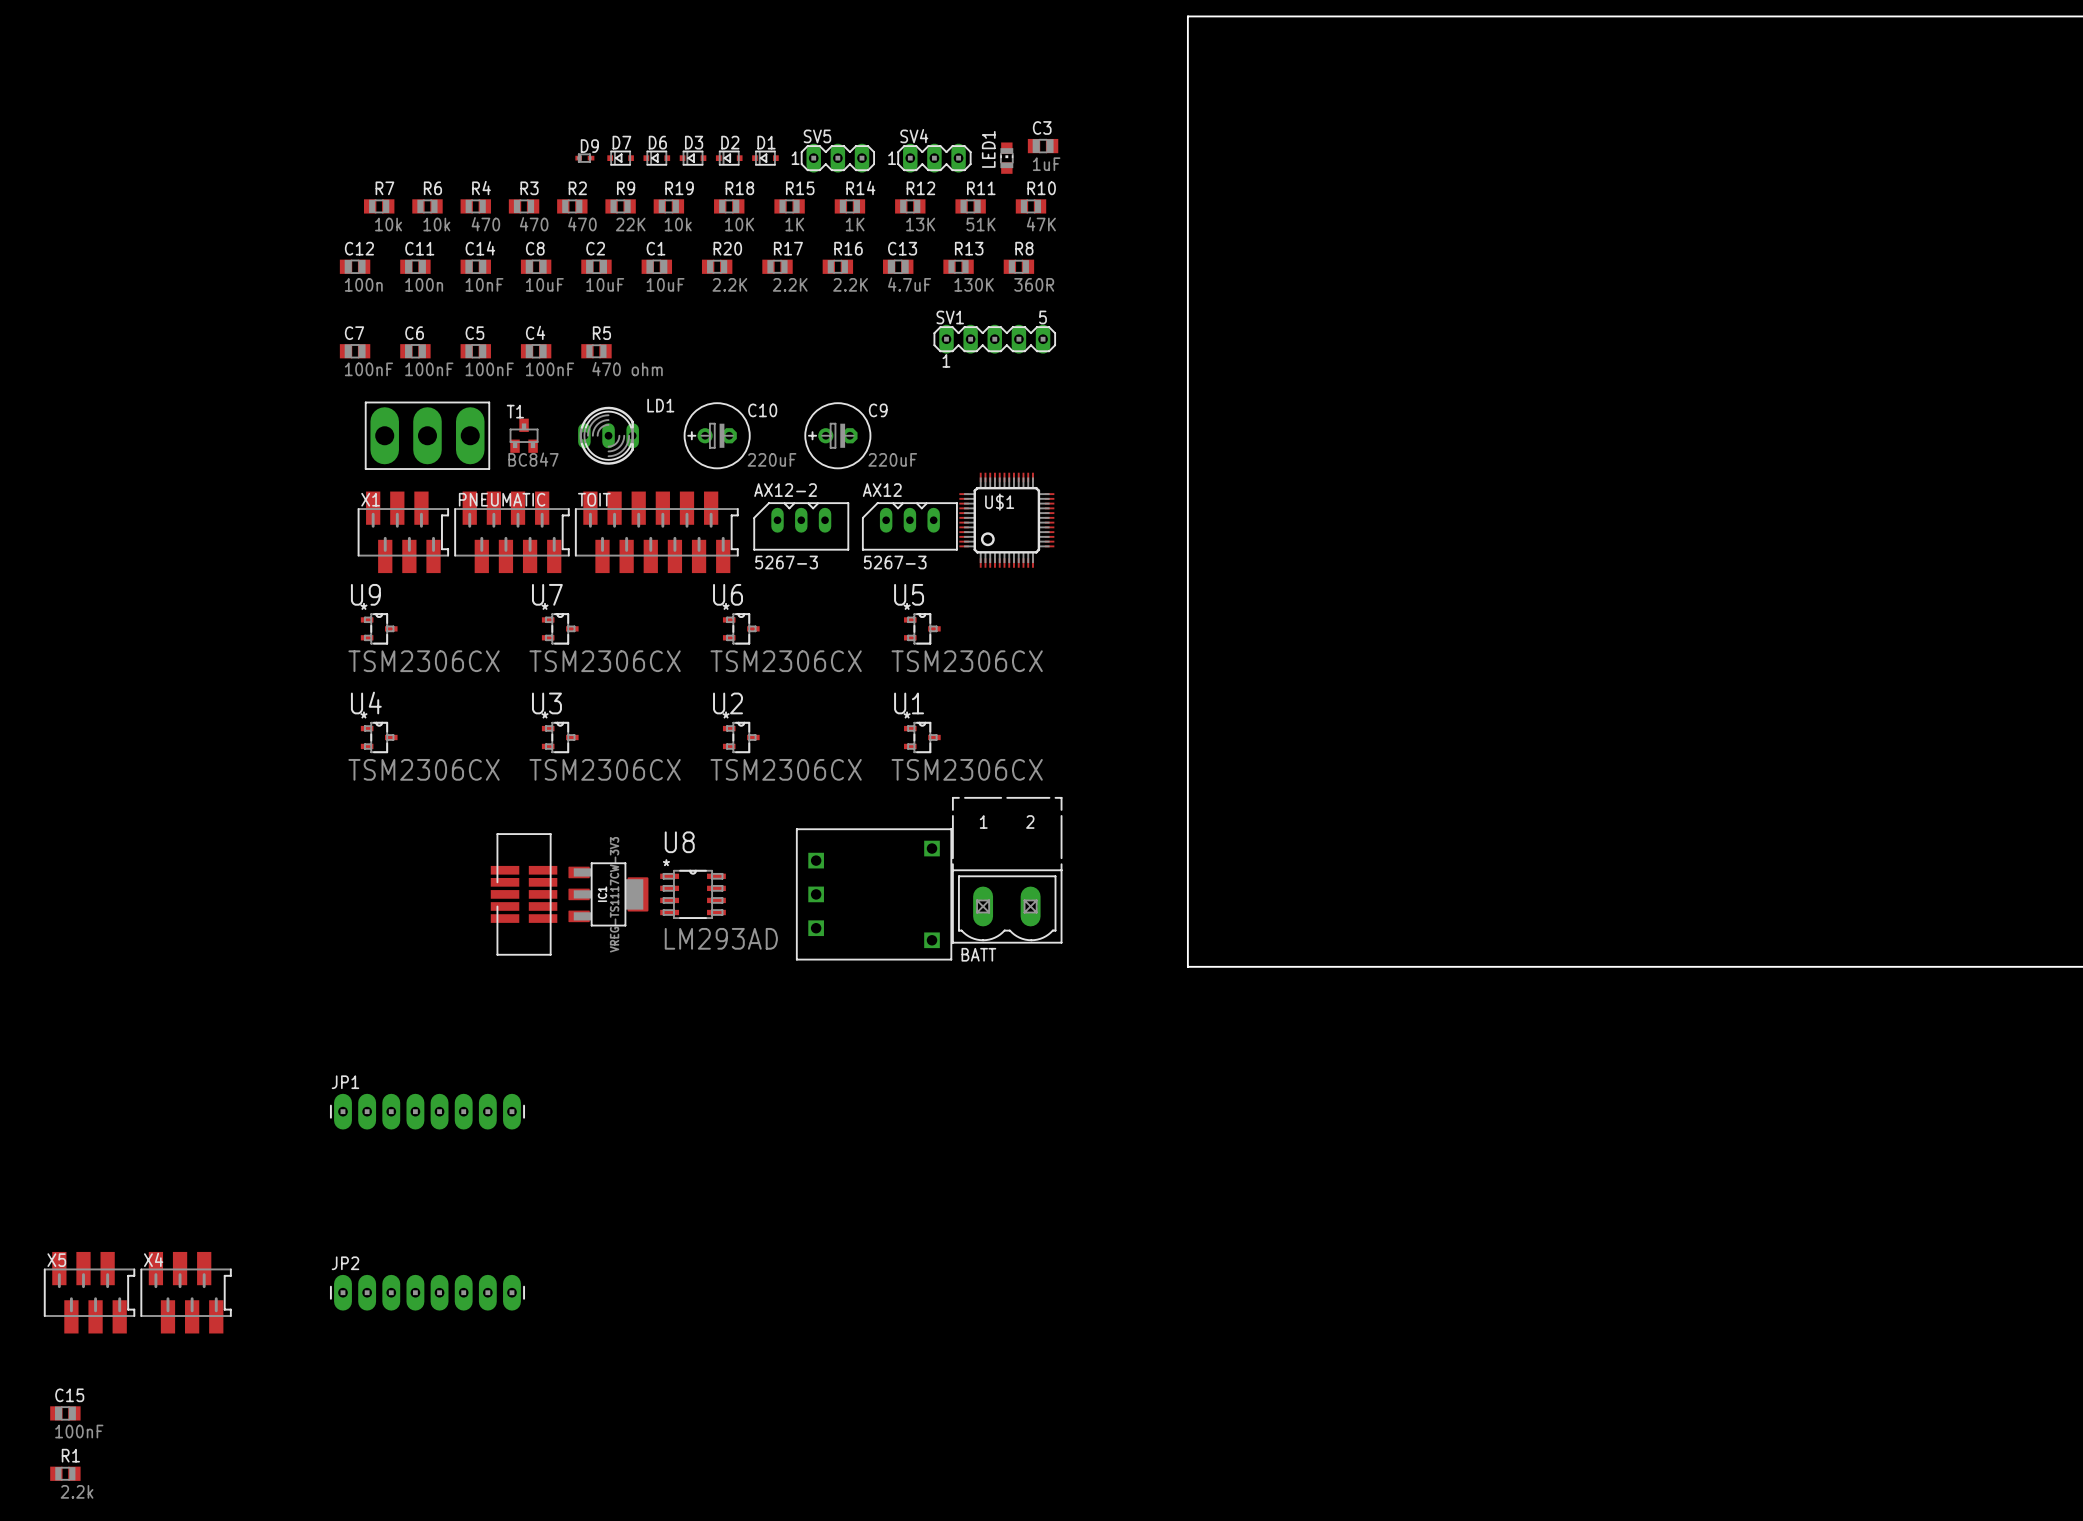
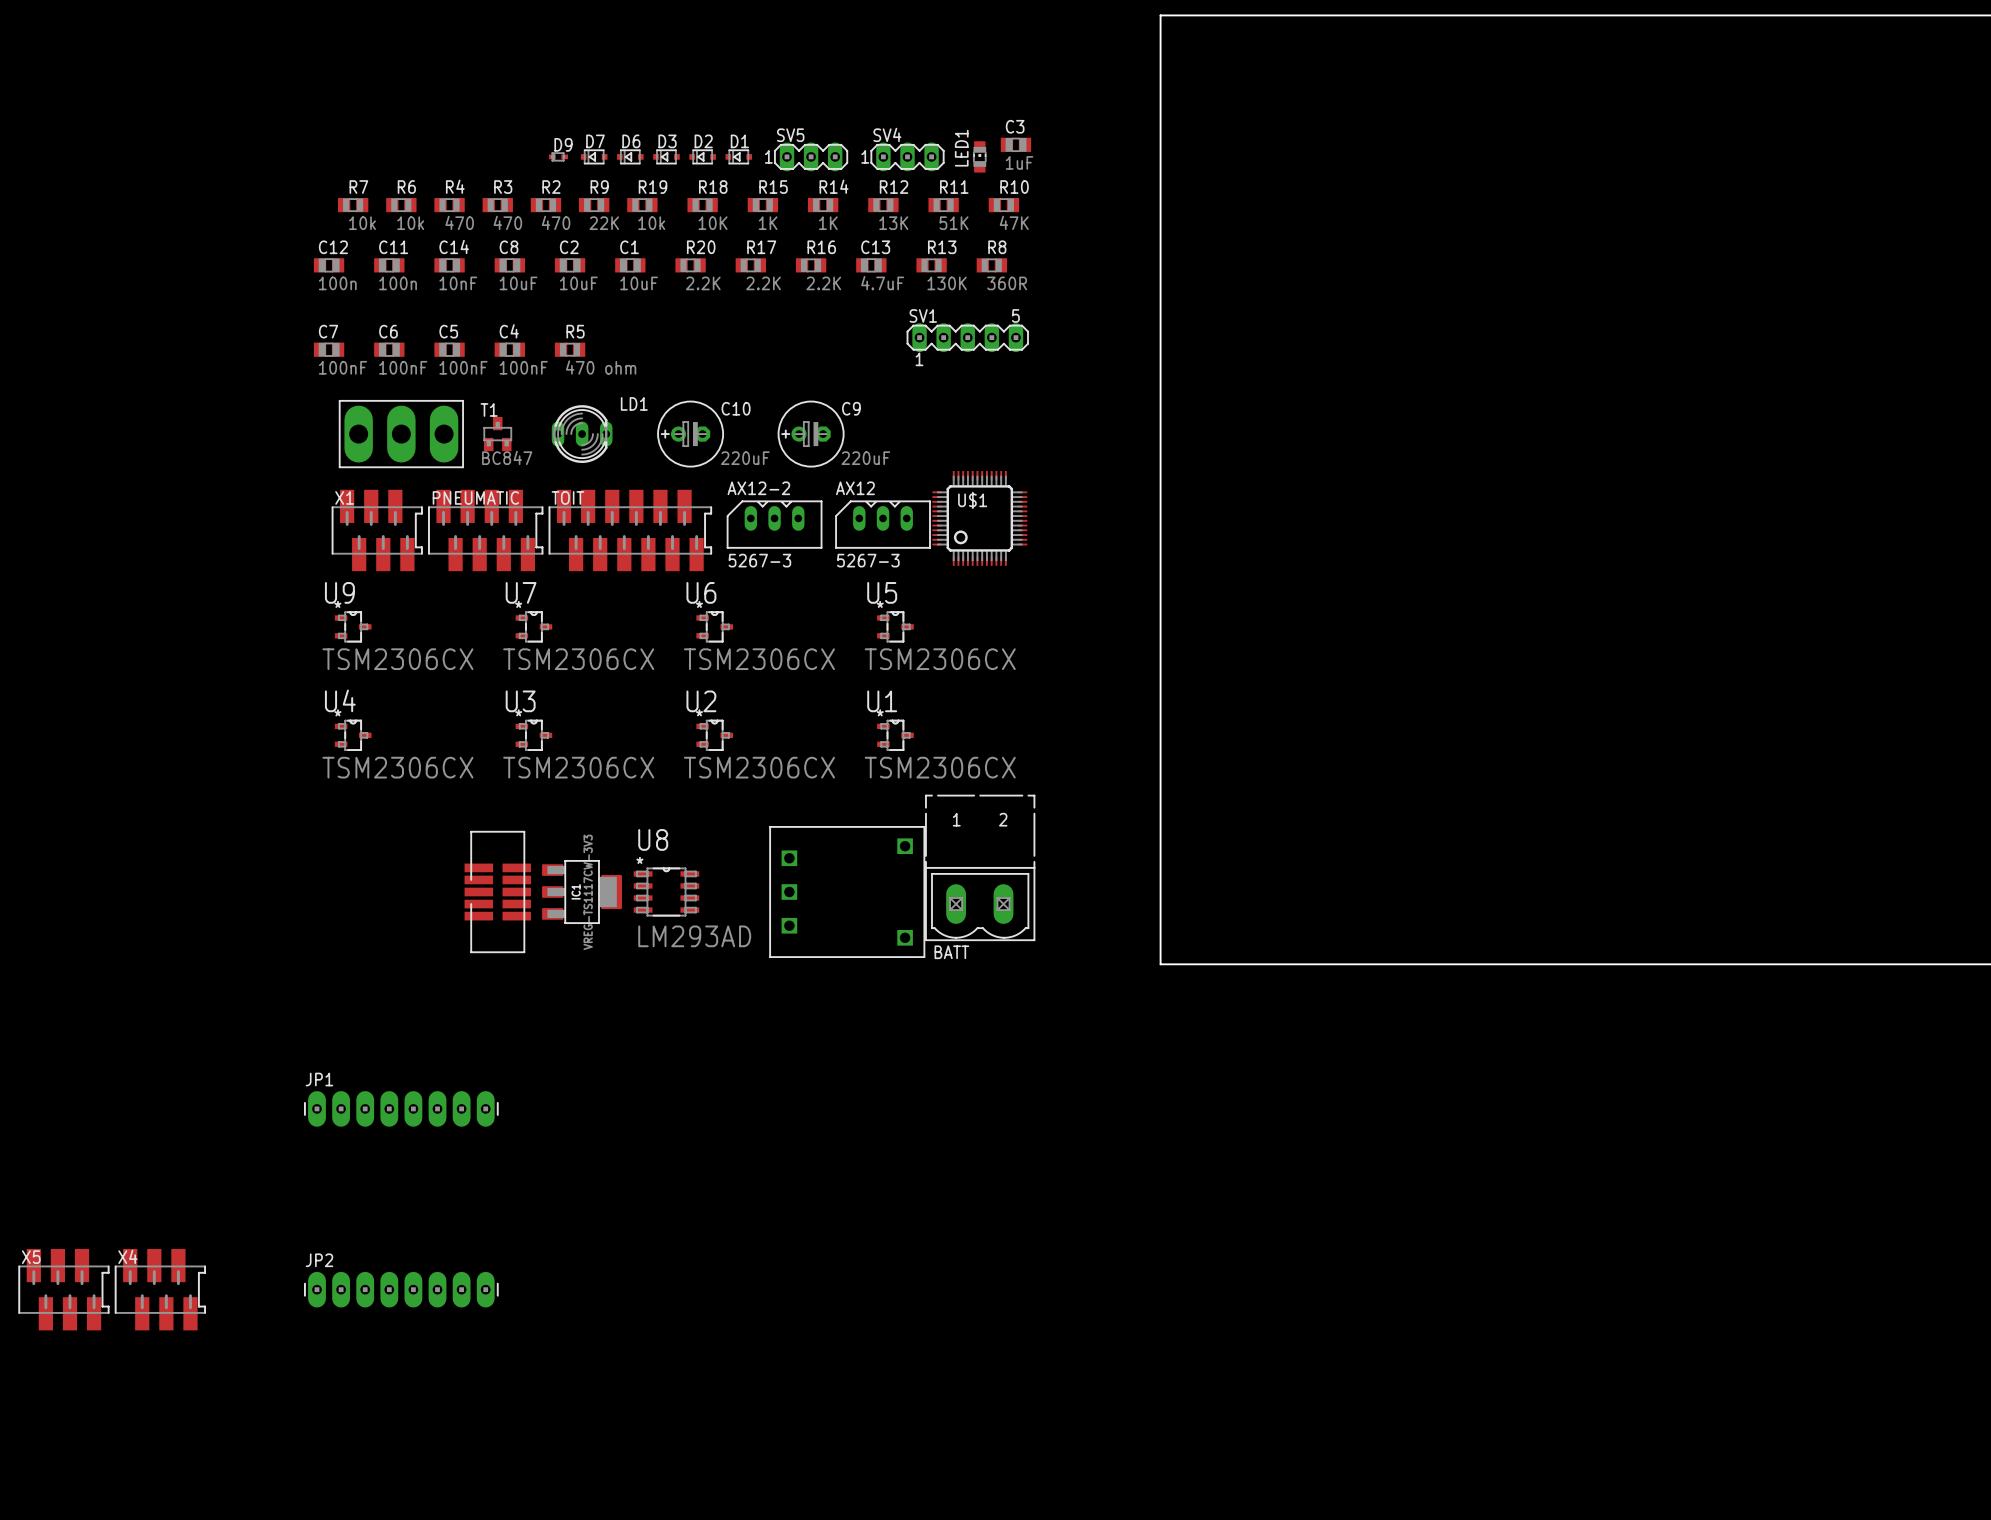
C15: 100nF (65, 1413) -> none
R1: 2.2k (65, 1473) -> none

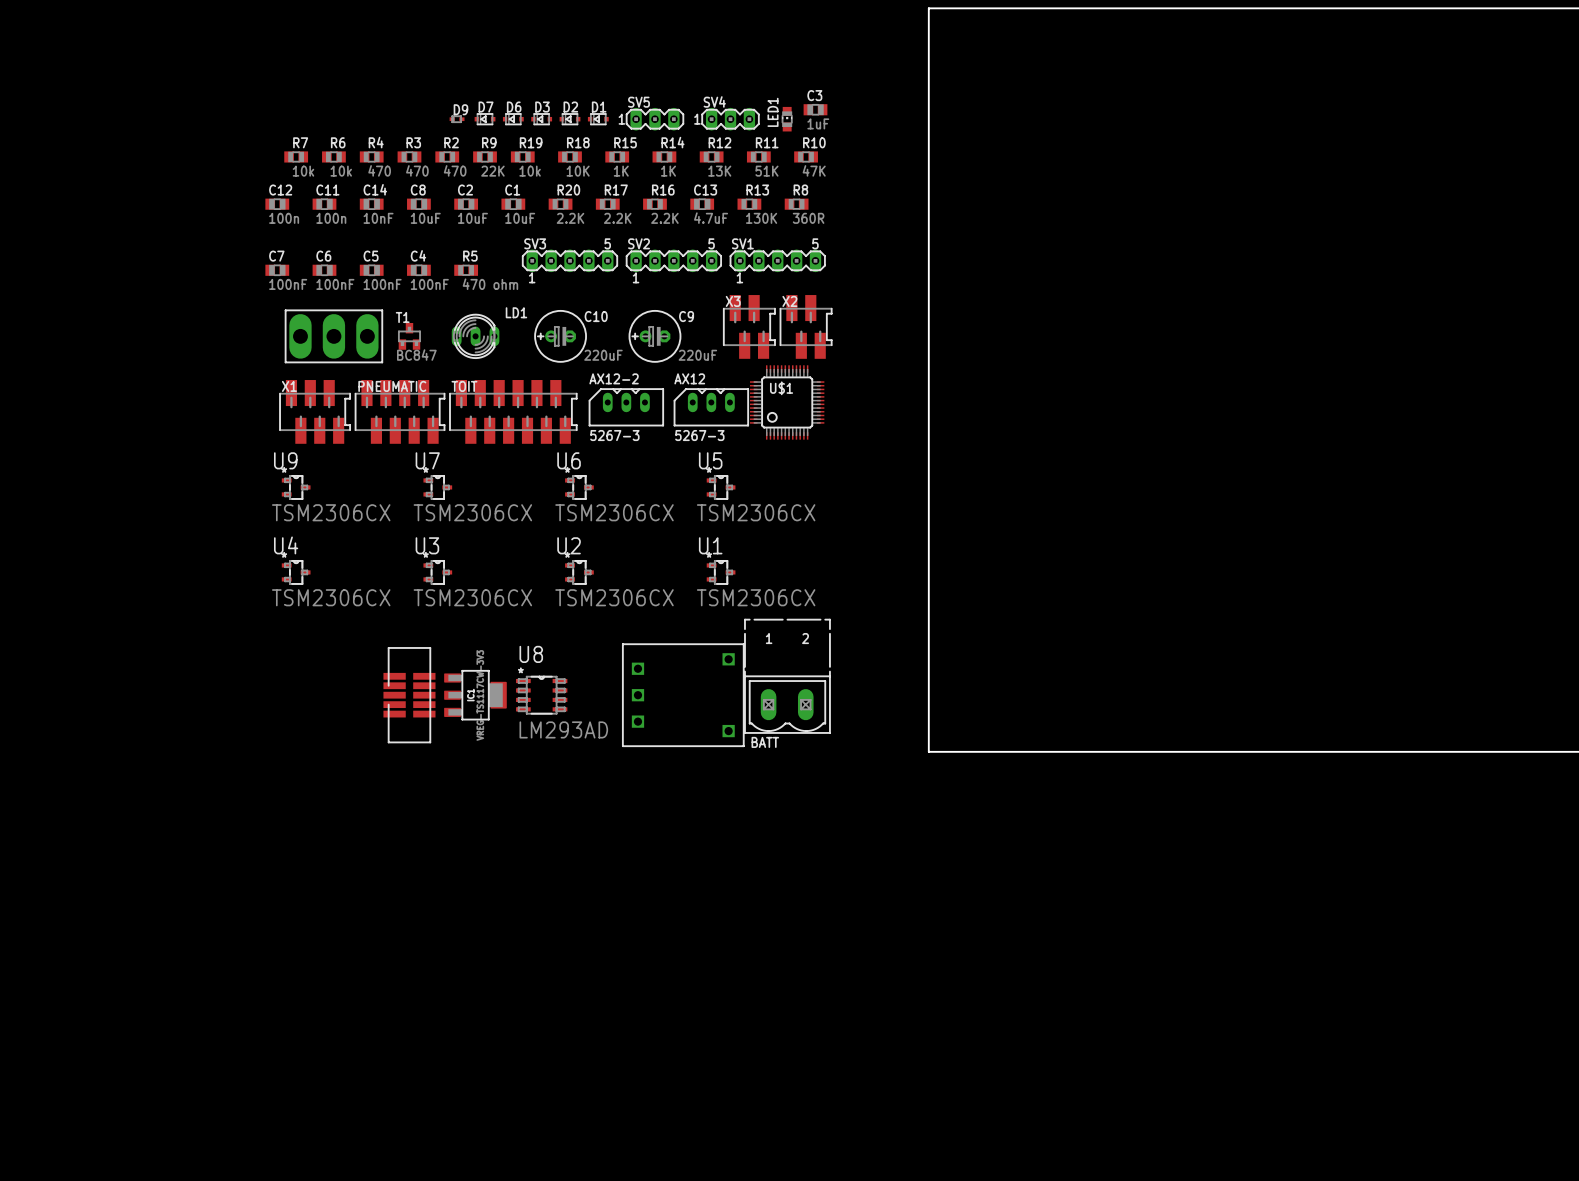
SV3: none -> (570, 260)
SV2: none -> (673, 260)
X3: none -> (749, 326)
X2: none -> (806, 326)
JP1: (401, 1108) -> none
X5: (63, 1289) -> none
X4: (160, 1289) -> none
JP2: (401, 1289) -> none

